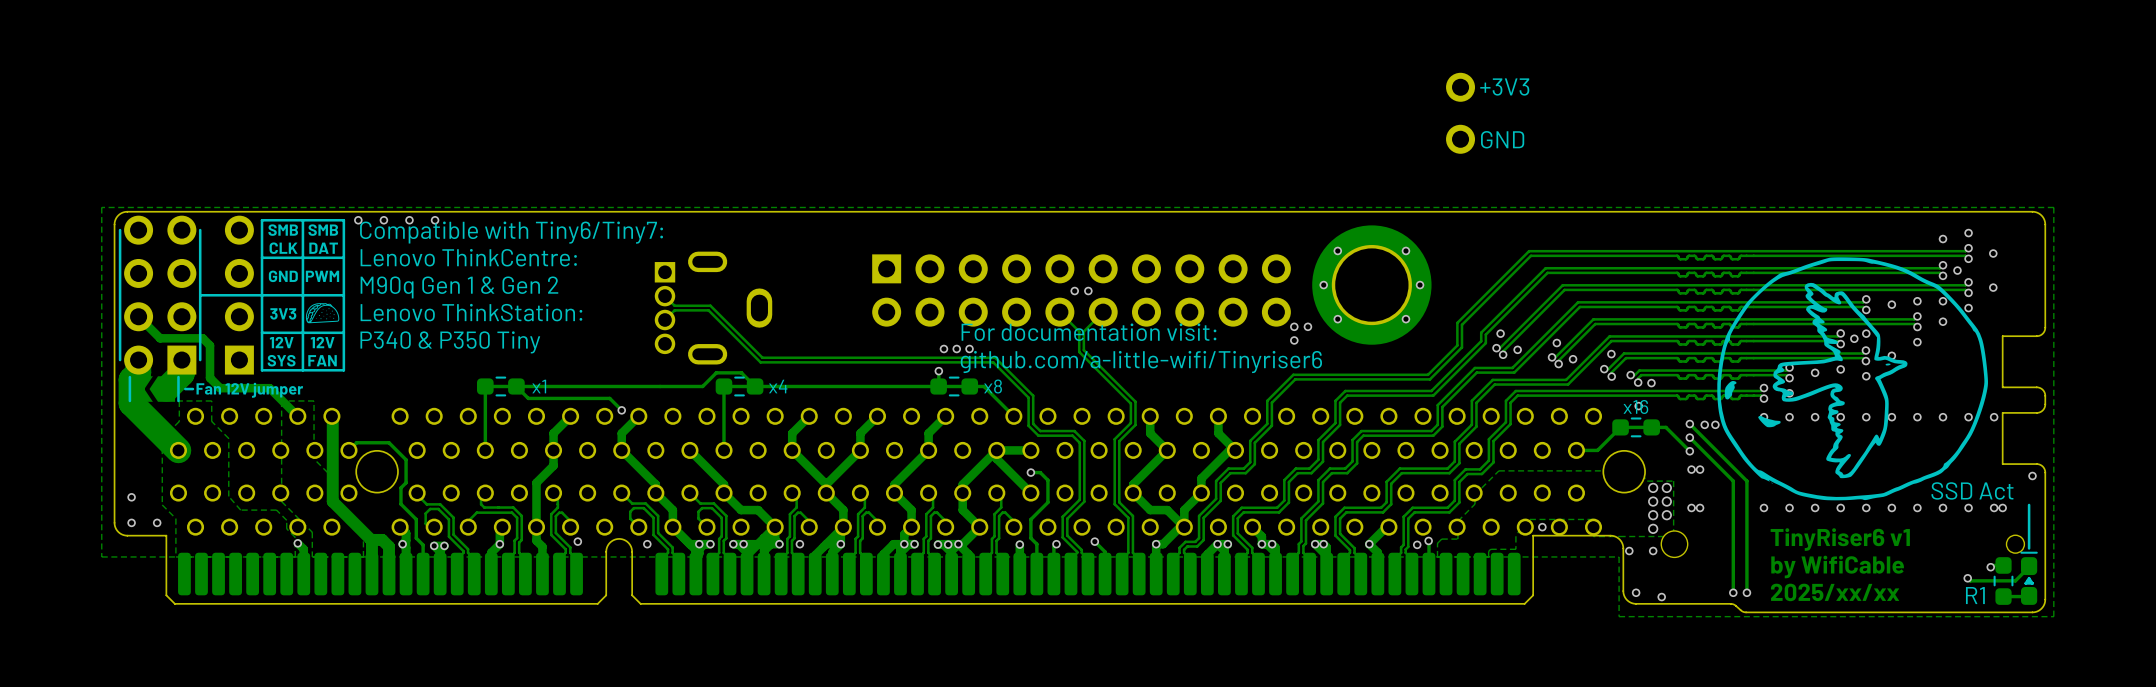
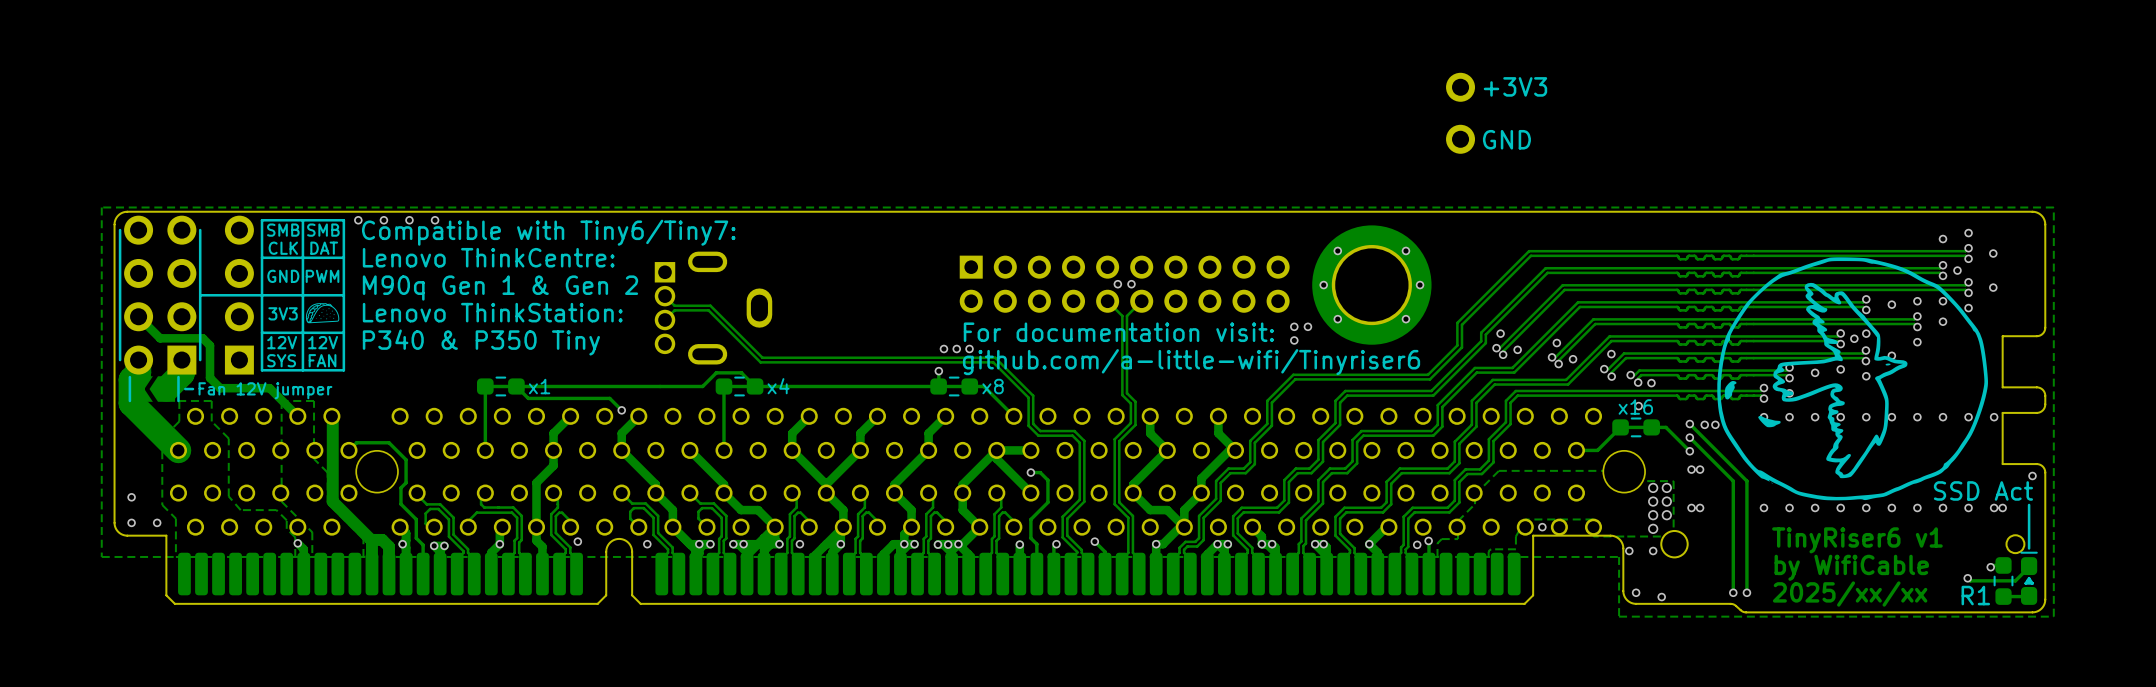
via: none -> (1117, 284)
part: none -> (1124, 284)
via: none -> (1131, 284)
part: (1081, 290) -> none
via: (1074, 291) -> none
via: (1088, 291) -> none
track: (1059, 312) (1079, 331) (1079, 351) (1122, 395) -> (1107, 301) (1122, 315) (1122, 395)
track: (1103, 312) (1083, 331) (1083, 350) (1126, 393) -> (1141, 301) (1126, 315) (1126, 393)

